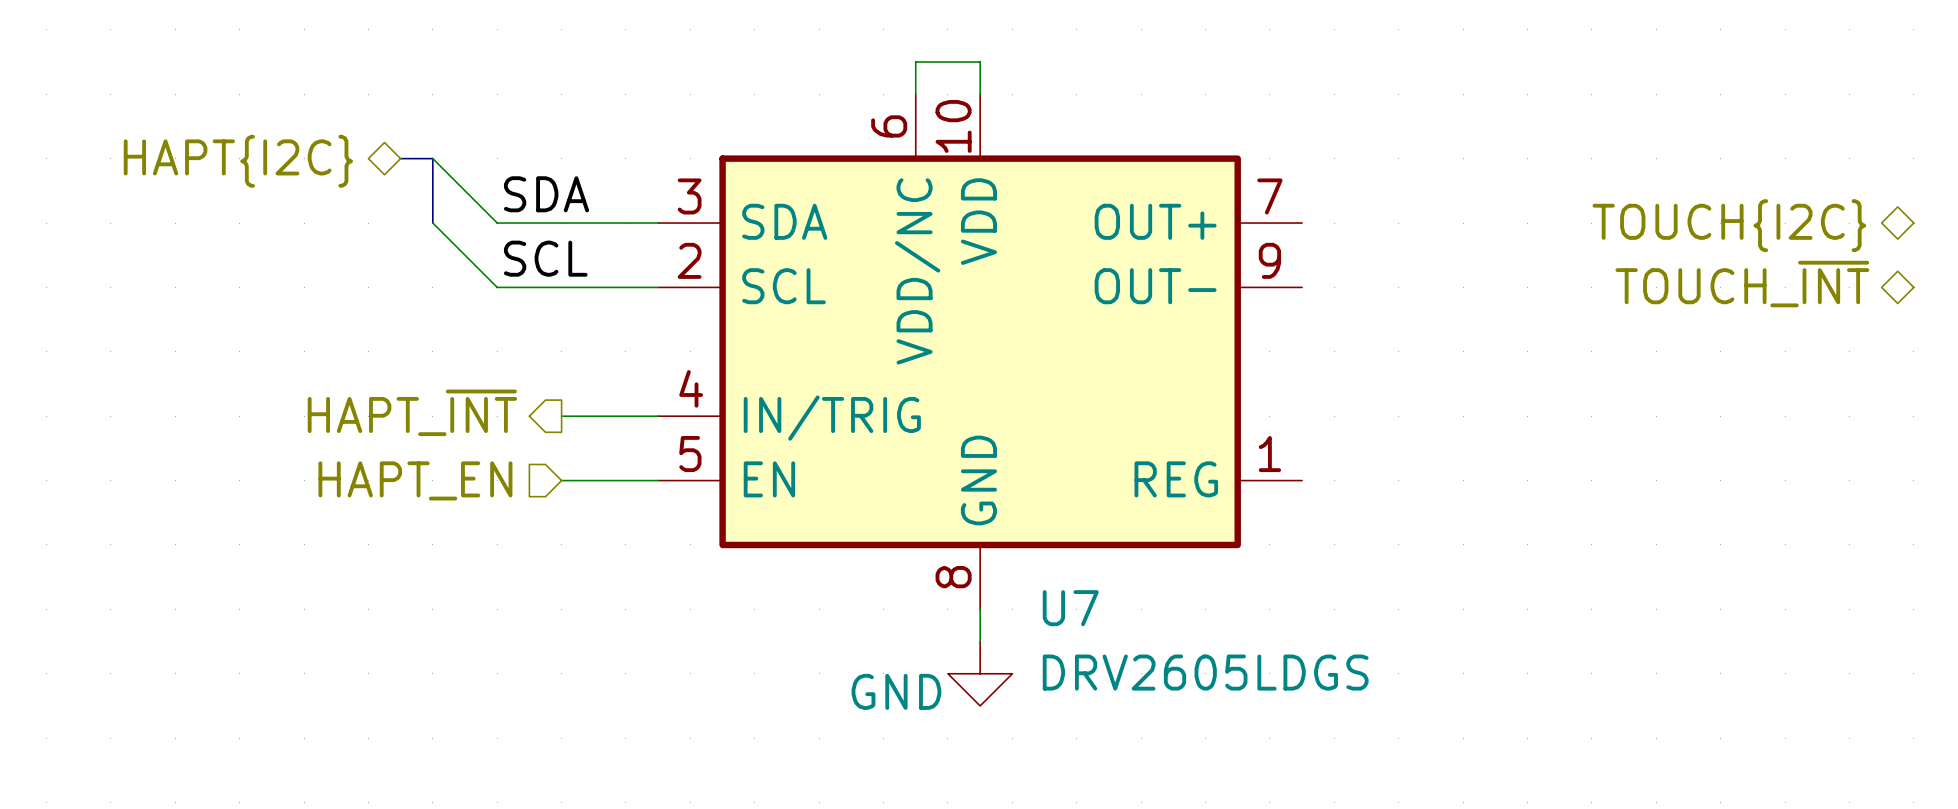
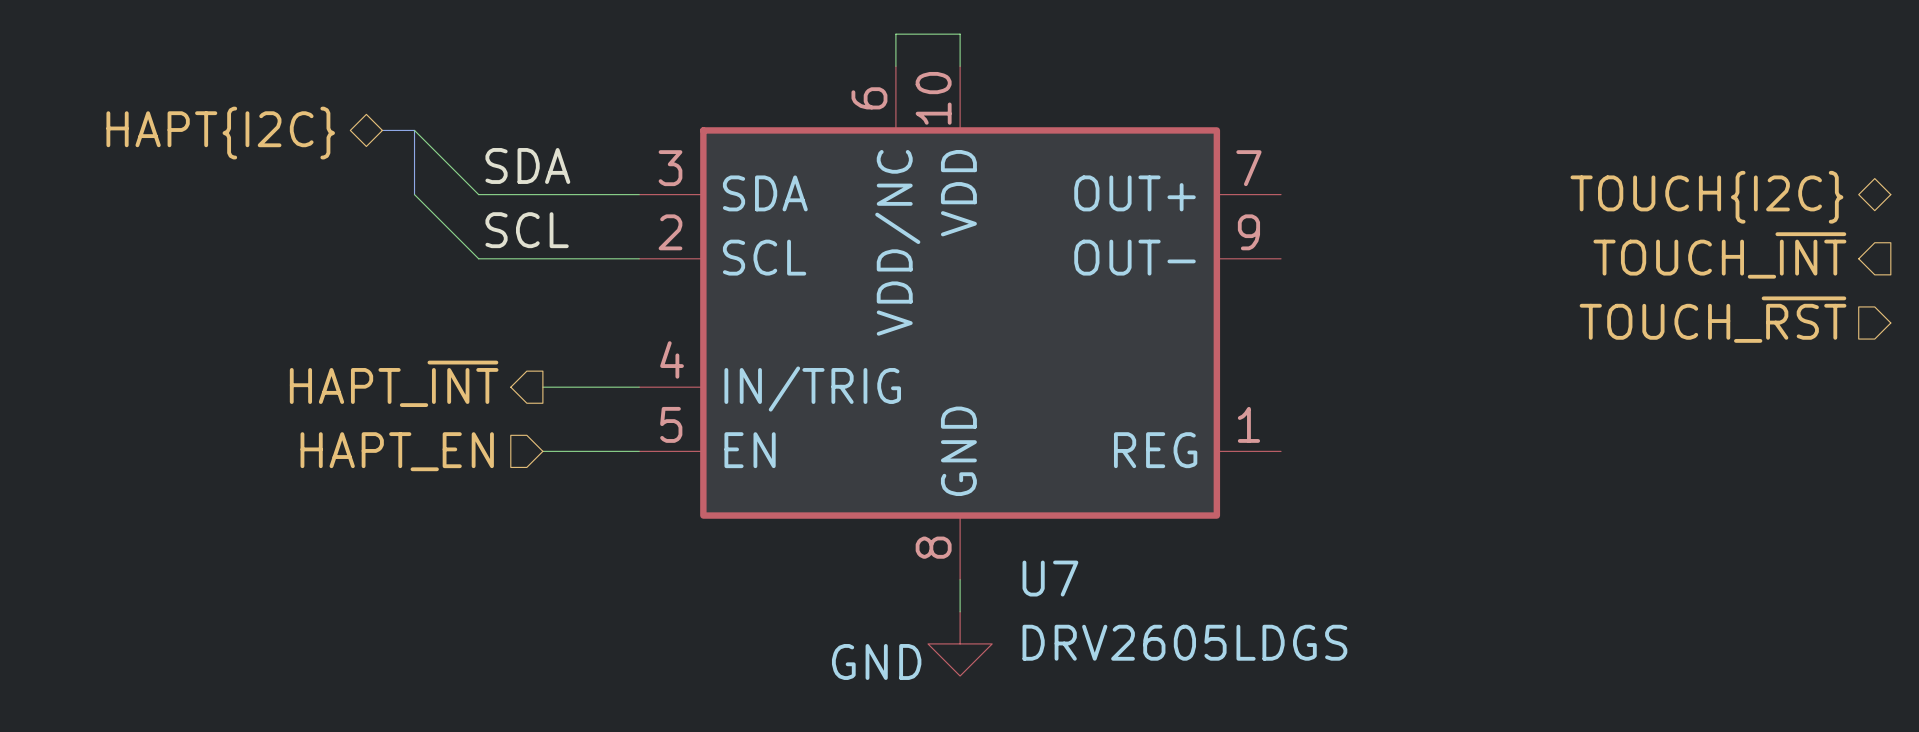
hierarchical label shape: bidirectional (1742, 284) -> output (1719, 255)
hierarchical label: none -> TOUCH_~{RST} (1713, 319)

